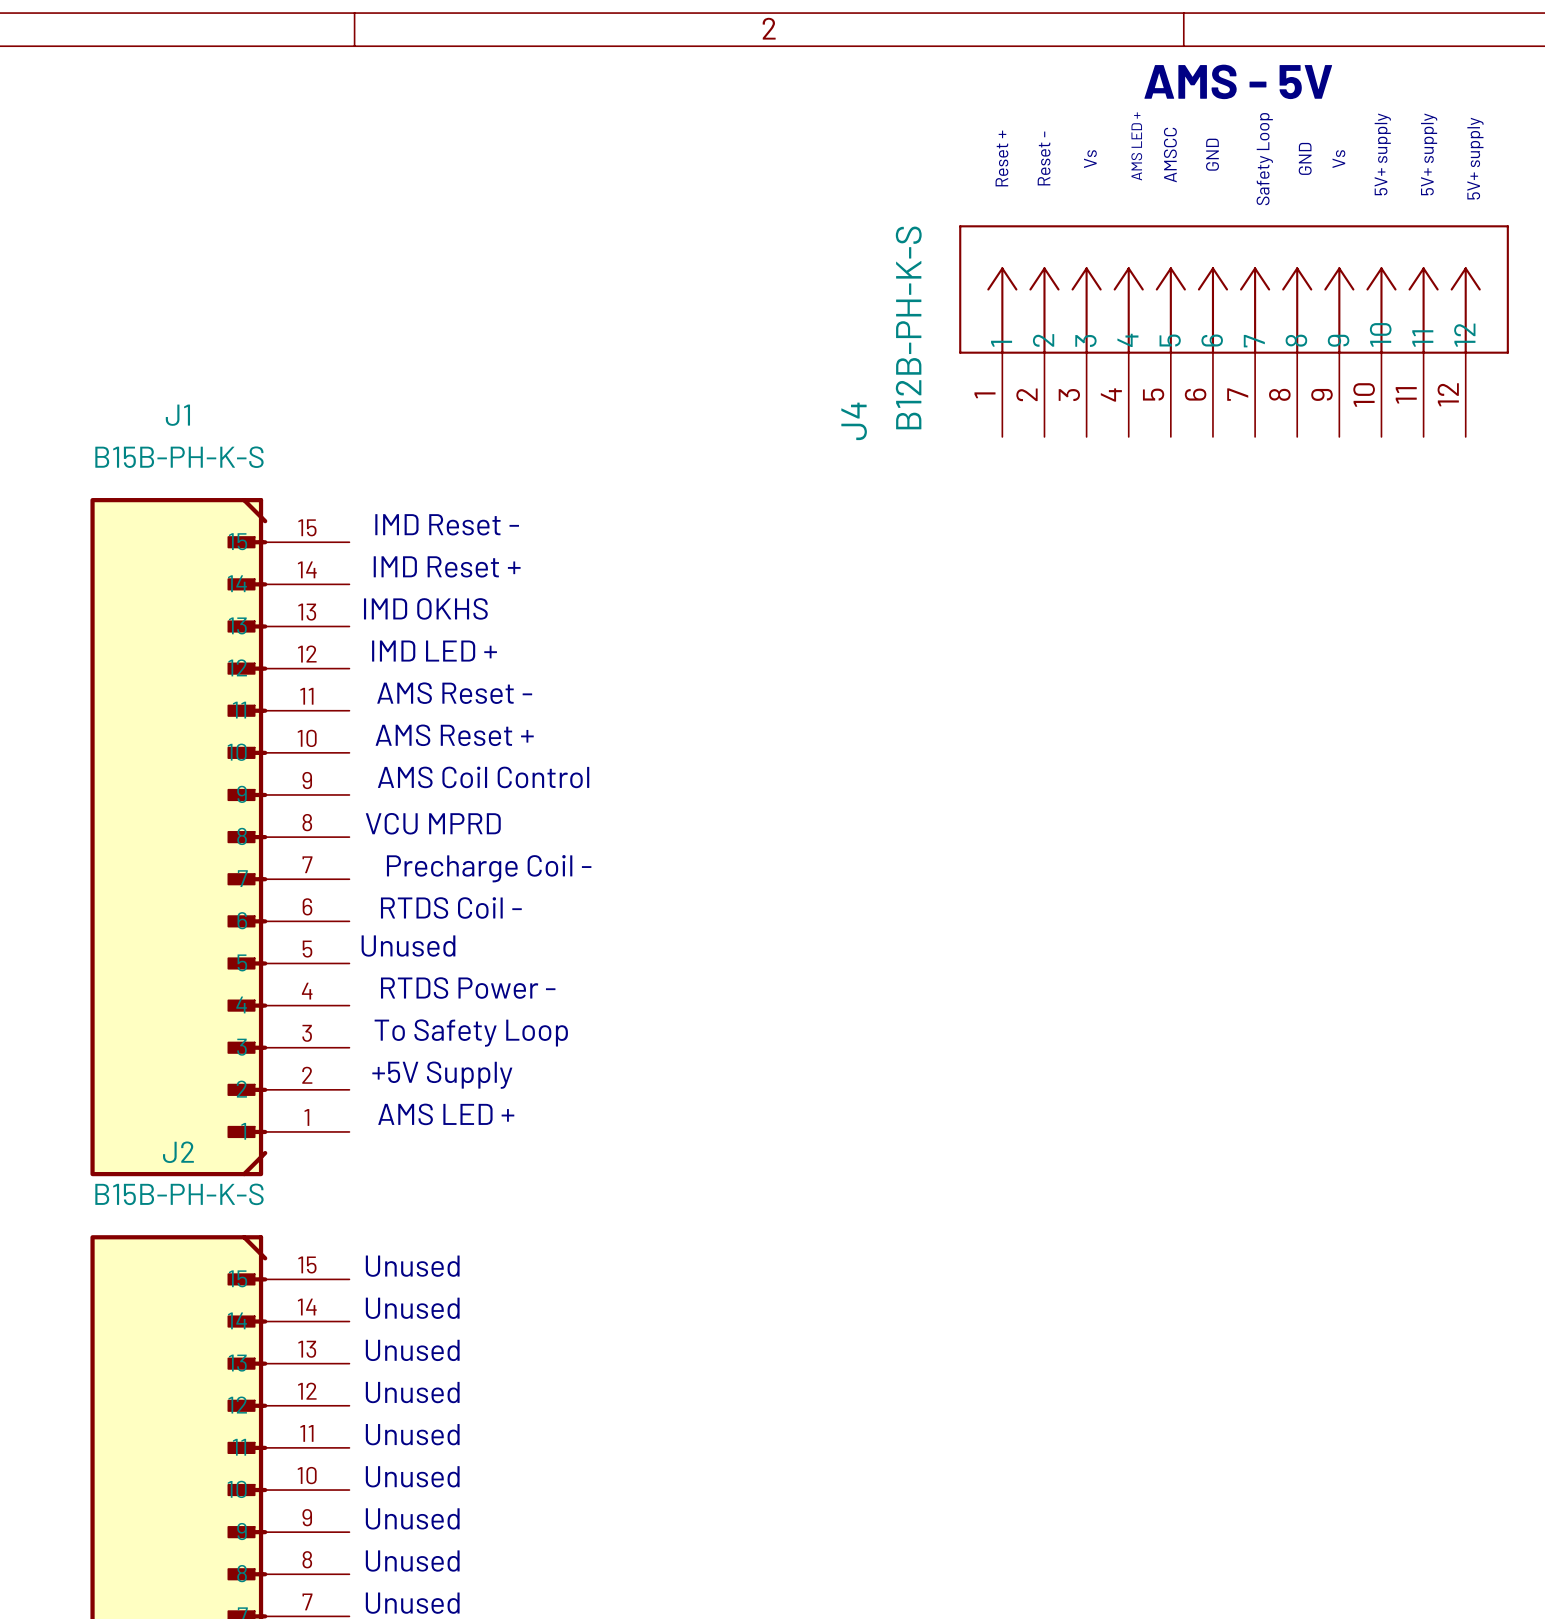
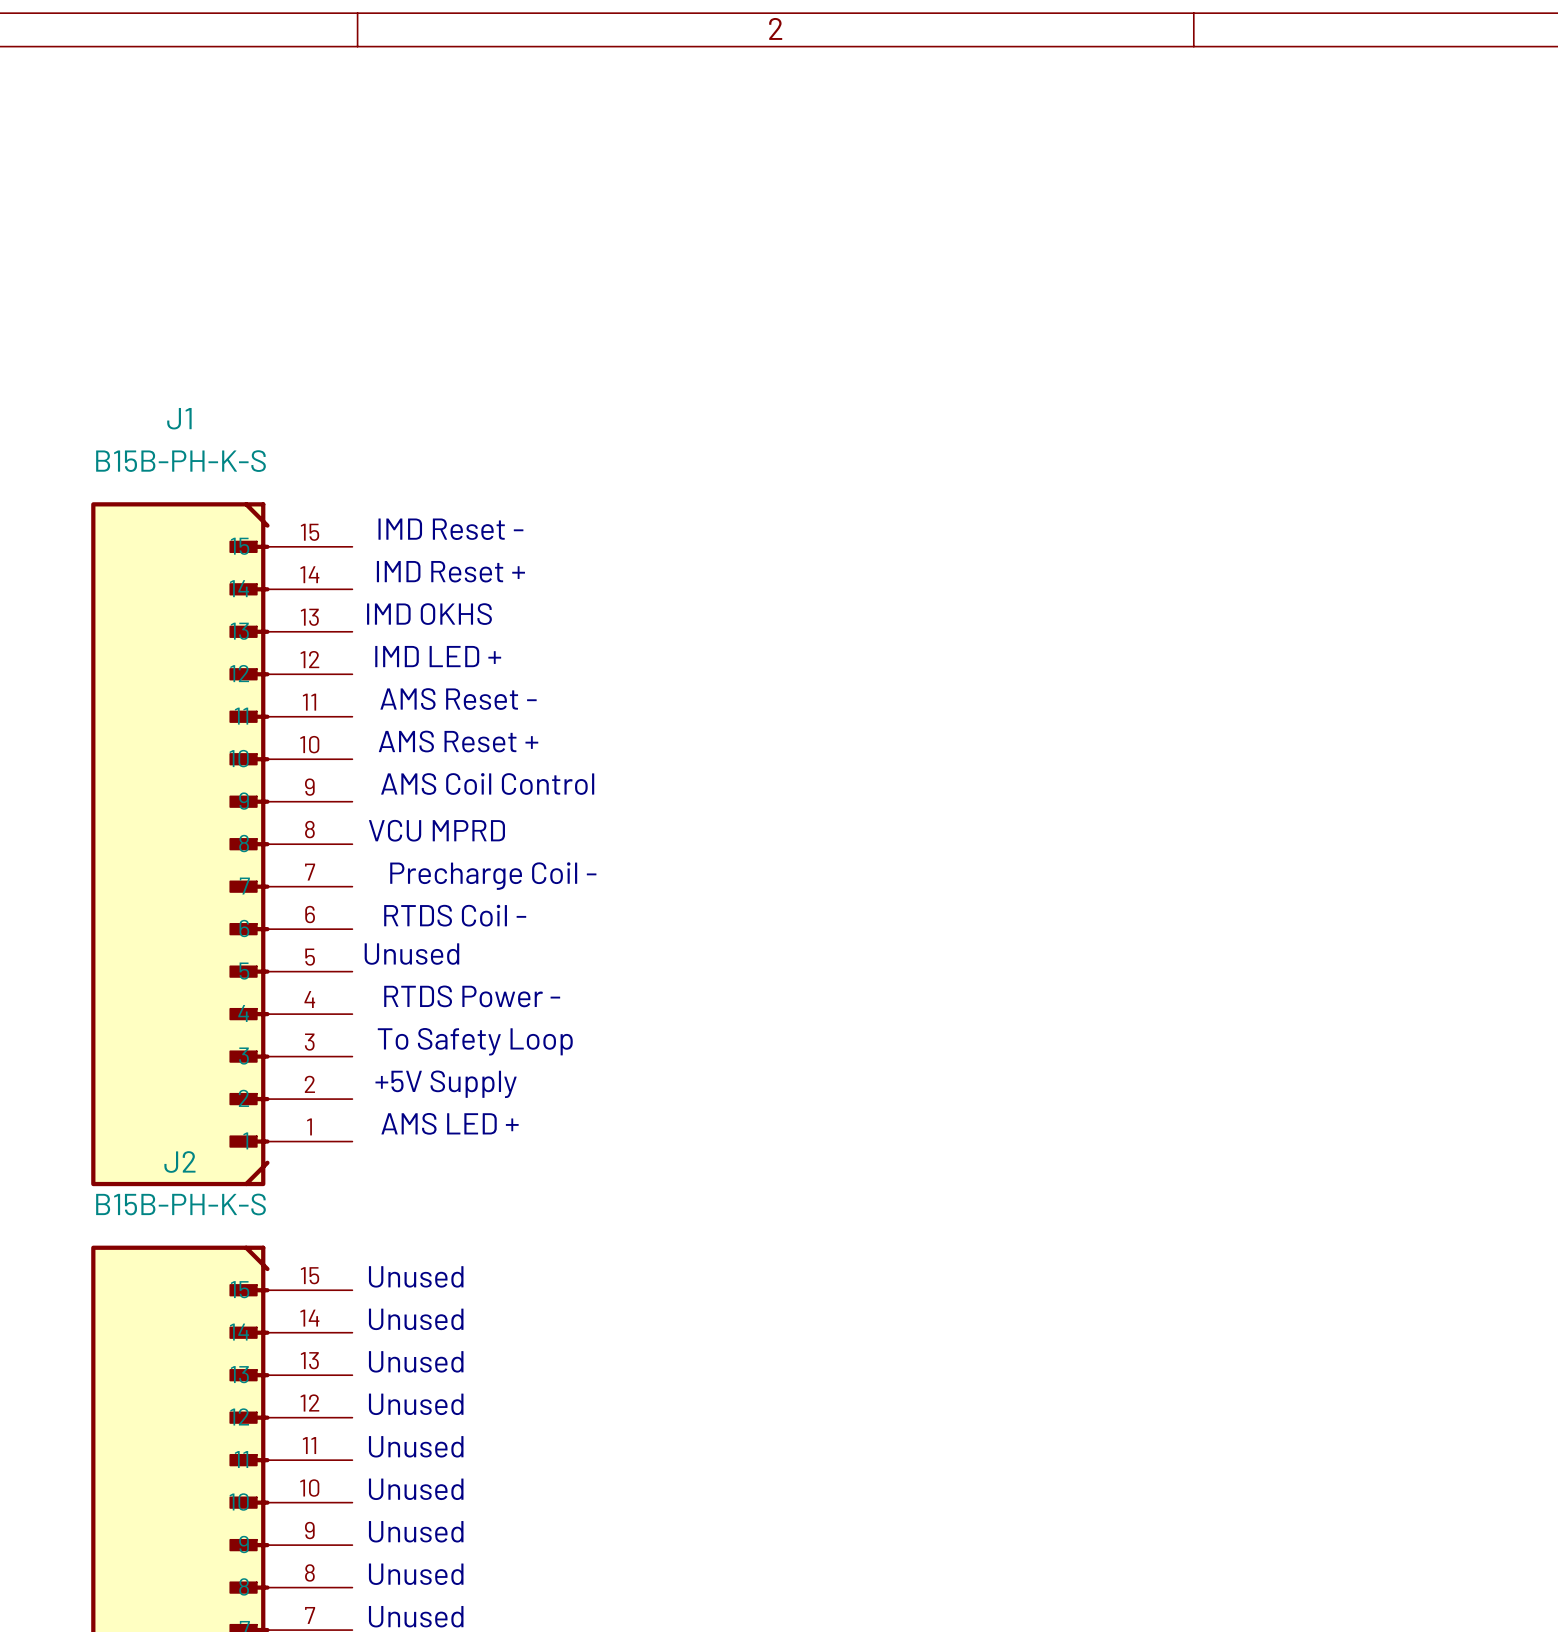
text: AMS - 5V (1238, 81) -> none
text: AMS LED + (1136, 146) -> none
text: GND (1212, 154) -> none
text: 5V+ supply (1382, 154) -> none
text: 5V+ supply (1429, 154) -> none
text: AMSCC (1170, 155) -> none
text: Reset + (1001, 158) -> none
text: Reset - (1044, 158) -> none
text: GND (1305, 158) -> none
text: 5V+ supply (1475, 158) -> none
text: Vs (1090, 159) -> none
text: Safety Loop (1264, 159) -> none
text: Vs (1338, 159) -> none
J4: B12B-PH-K-S (1234, 331) -> none

